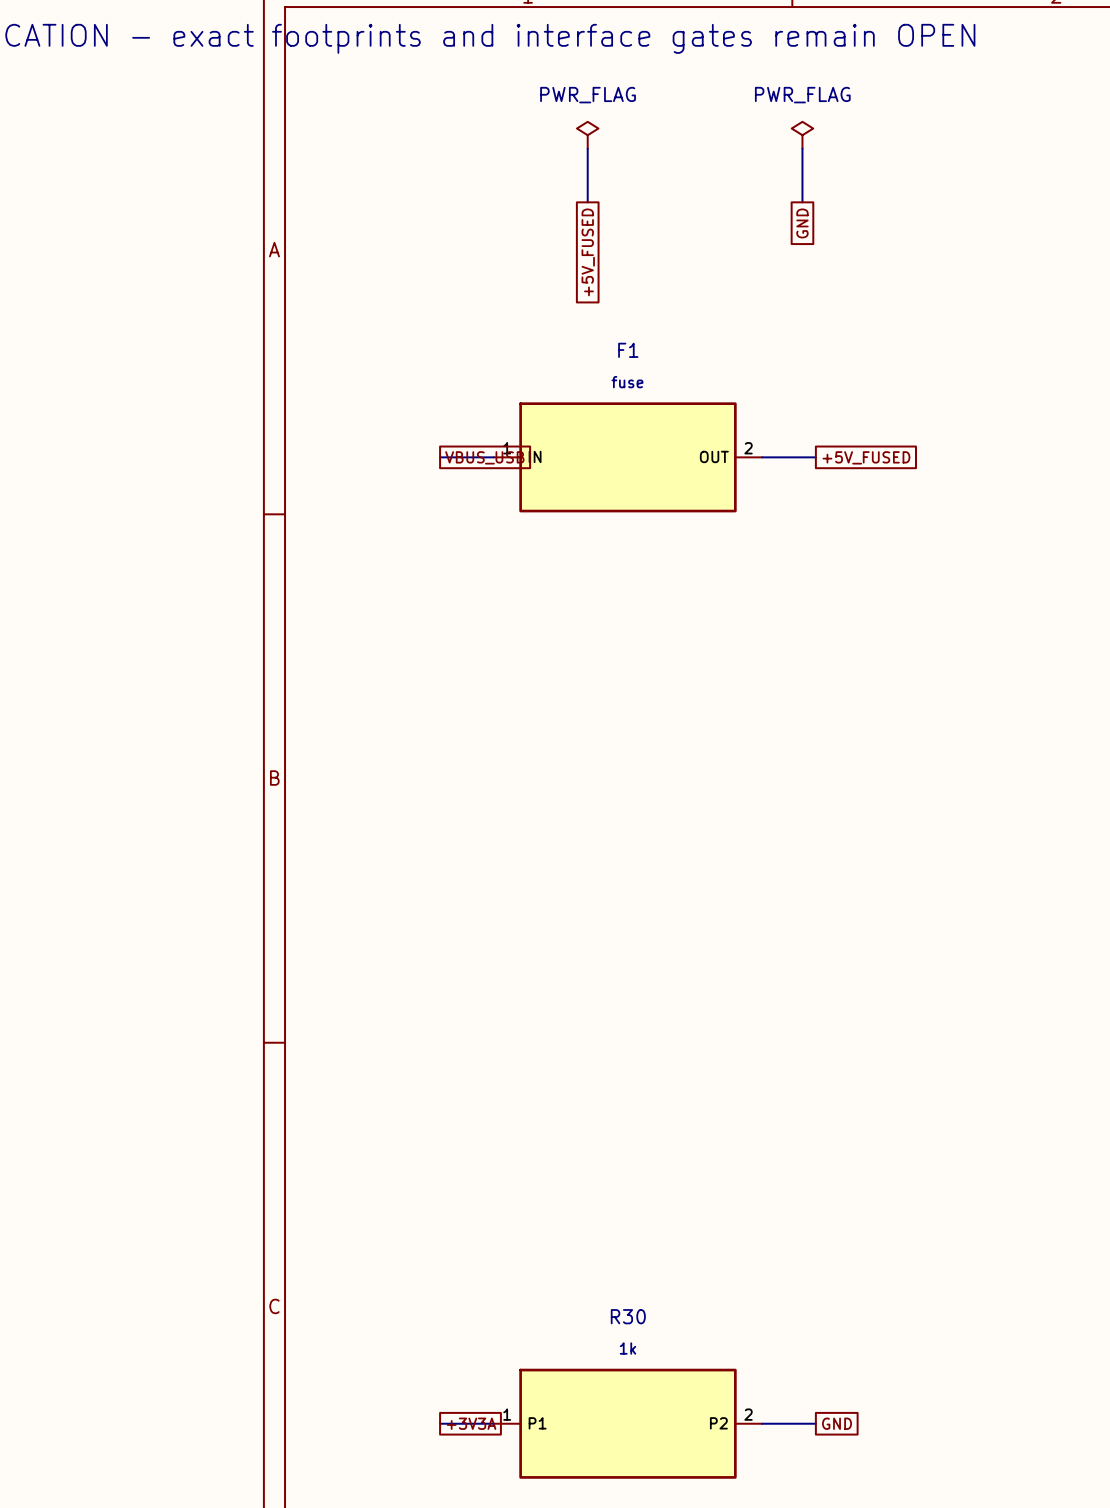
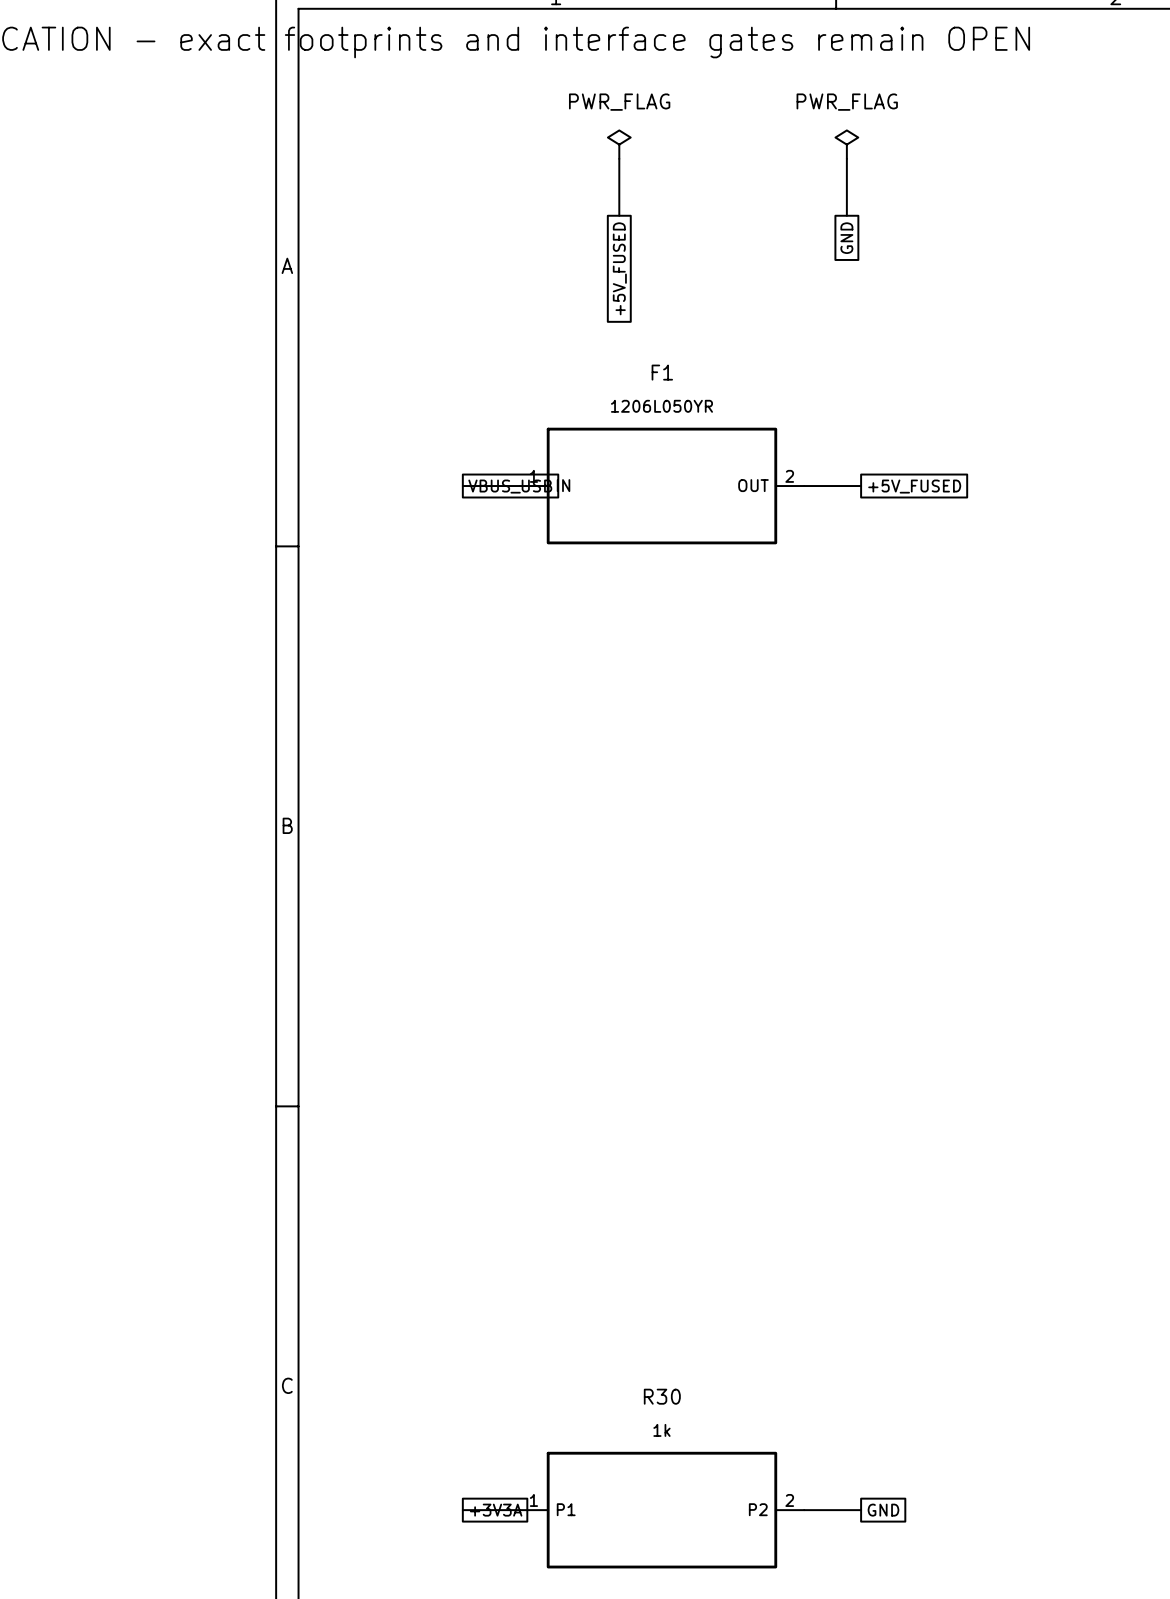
F1 value: fuse (627, 382) -> 1206L050YR (661, 406)

